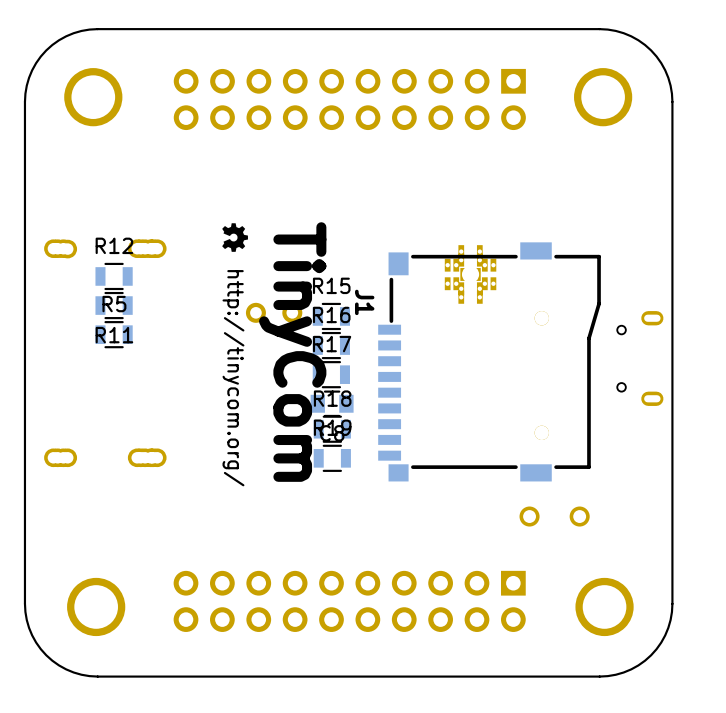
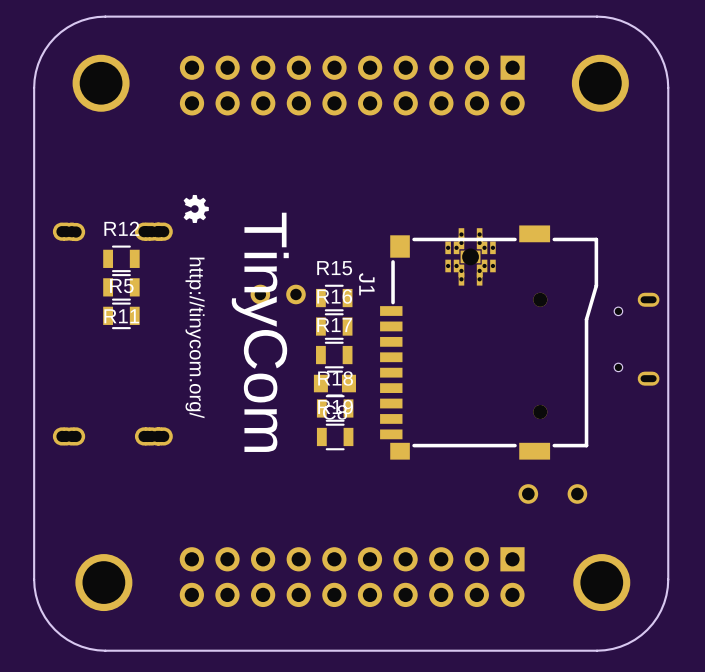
drawing position: (235, 237) -> (196, 208)
text position: TinyCom (292, 352) -> TinyCom (260, 332)
text position: http://tinycom.org/ (233, 378) -> http://tinycom.org/ (195, 337)

